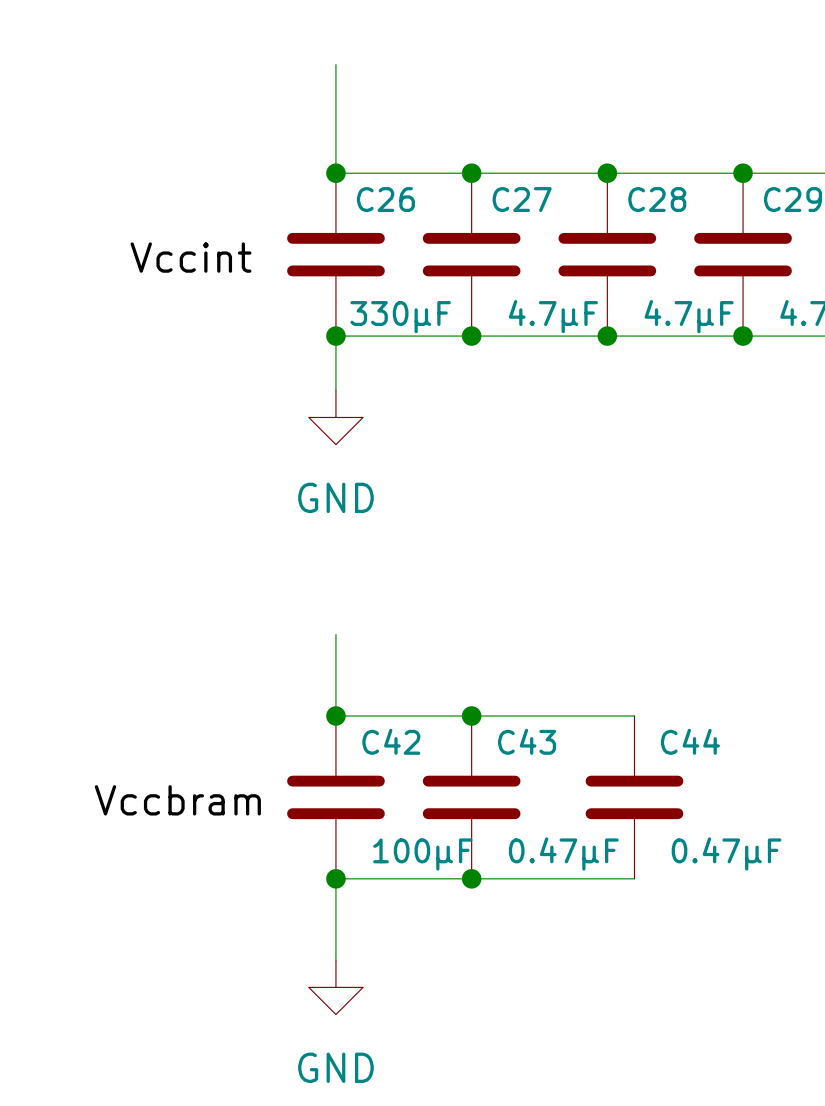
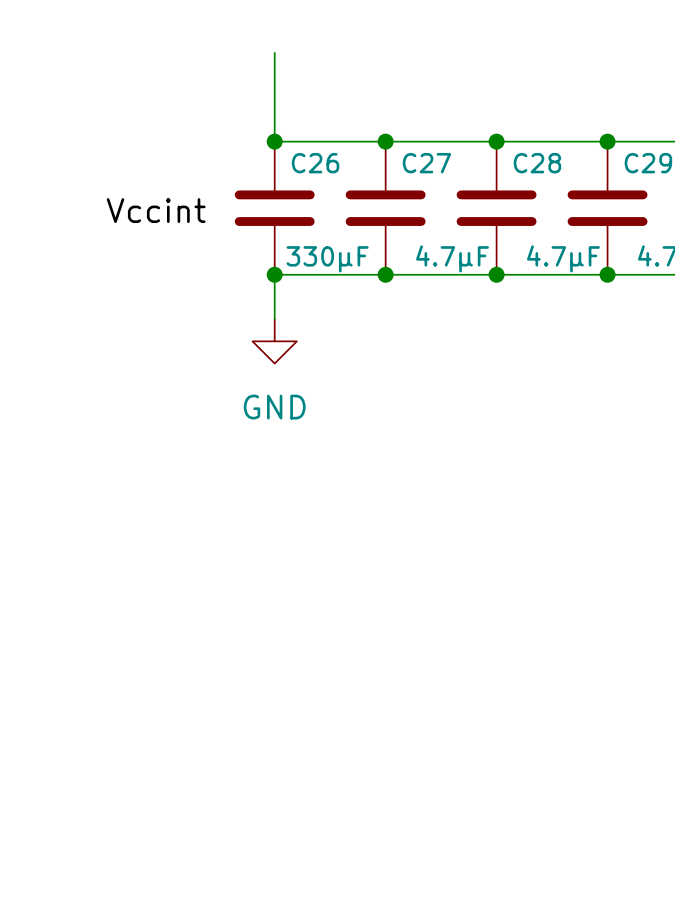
wire: (335, 634) (335, 715) (634, 715) -> none
junction: (335, 715) -> none
junction: (471, 715) -> none
C42: 100µF (335, 797) -> none
C43: 0.47µF (471, 797) -> none
C44: 0.47µF (634, 797) -> none
label: Vccbram (177, 800) -> none
junction: (335, 878) -> none
junction: (471, 878) -> none
wire: (634, 878) (335, 878) (335, 960) -> none
power symbol: GND (335, 987) -> none

